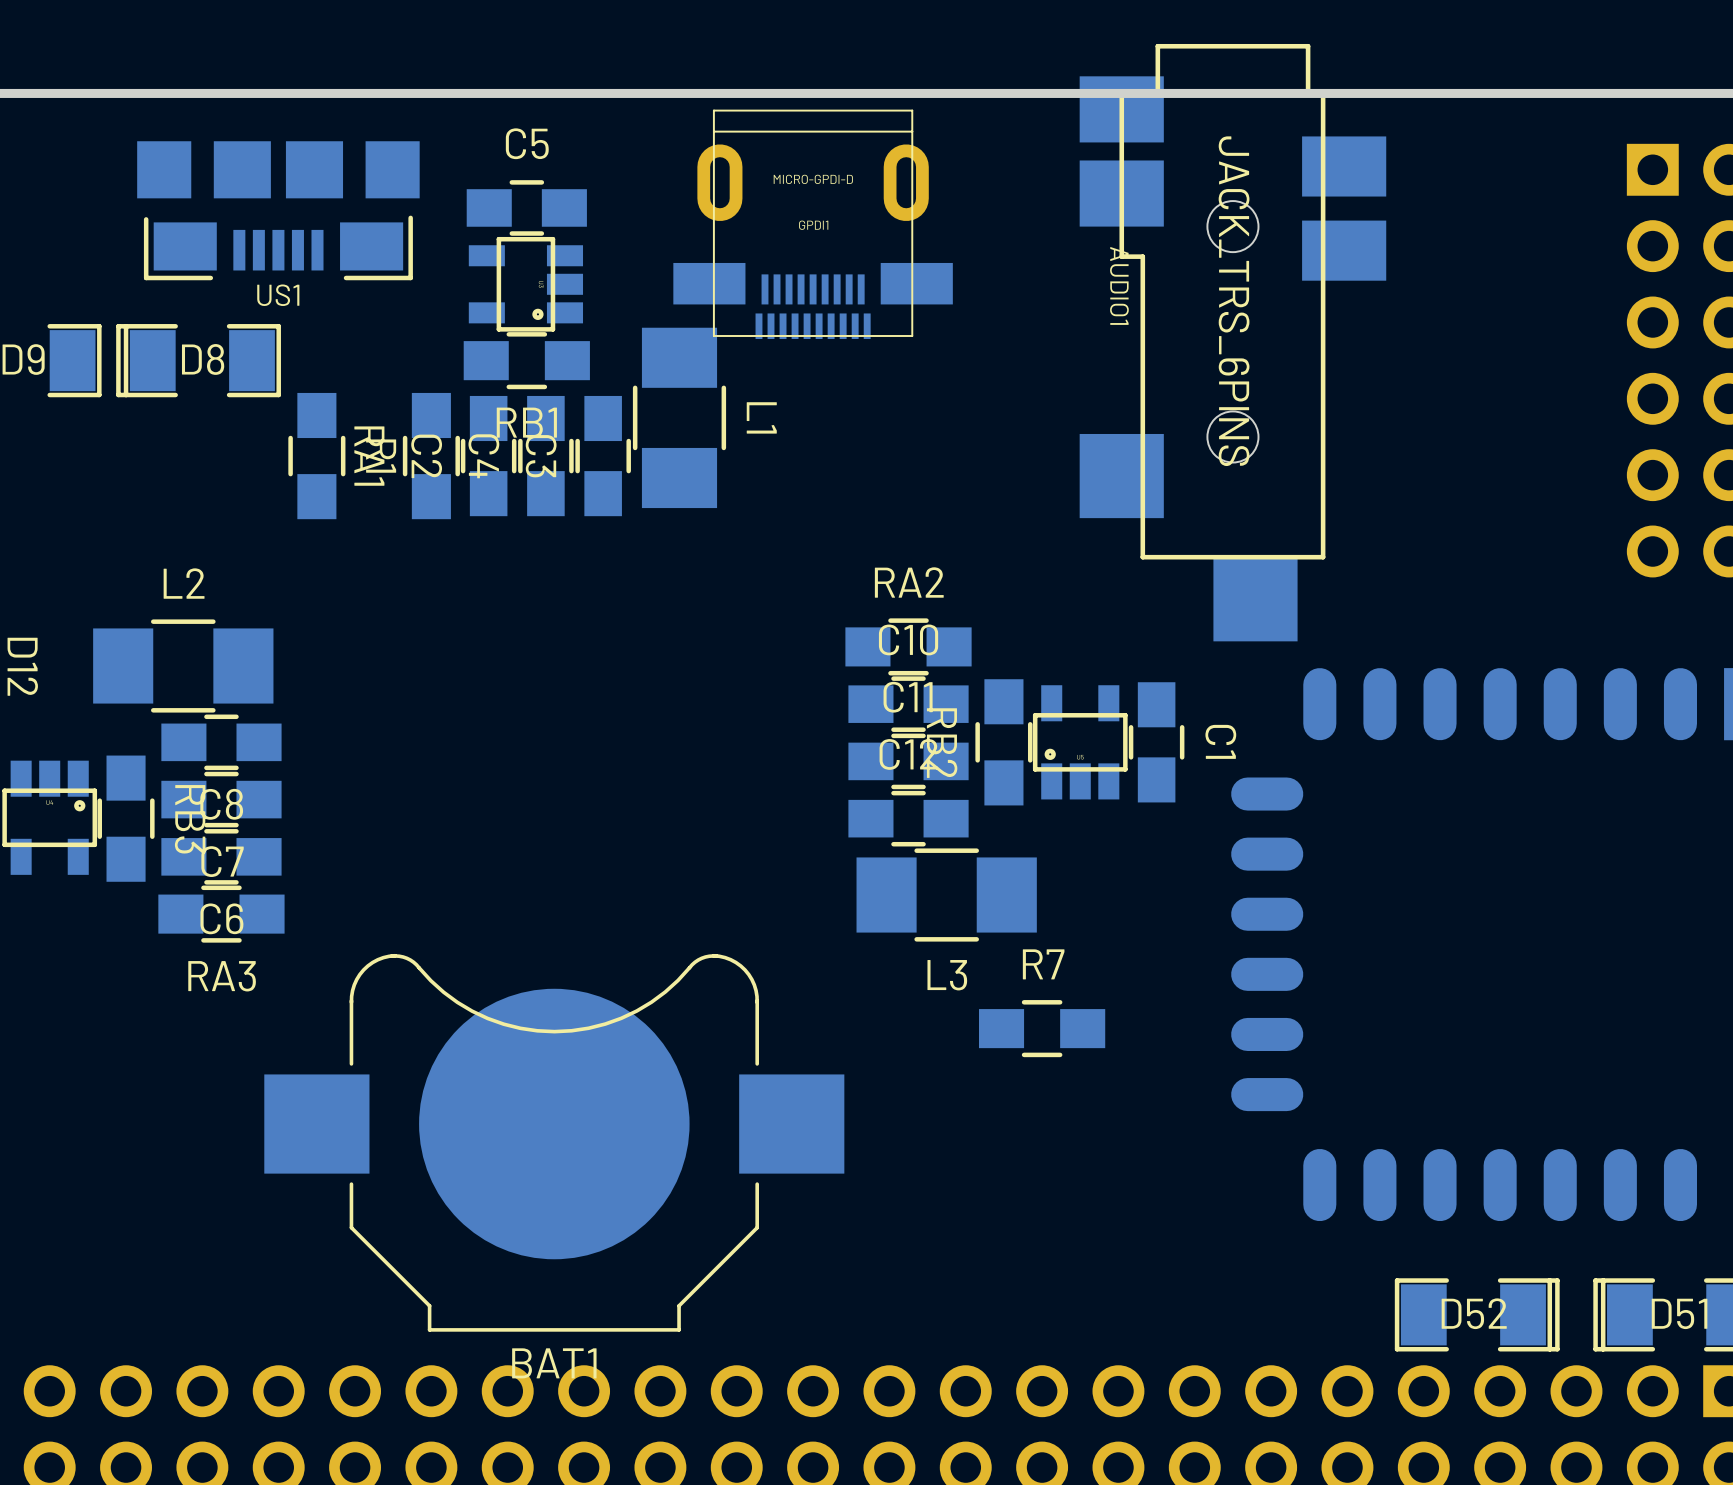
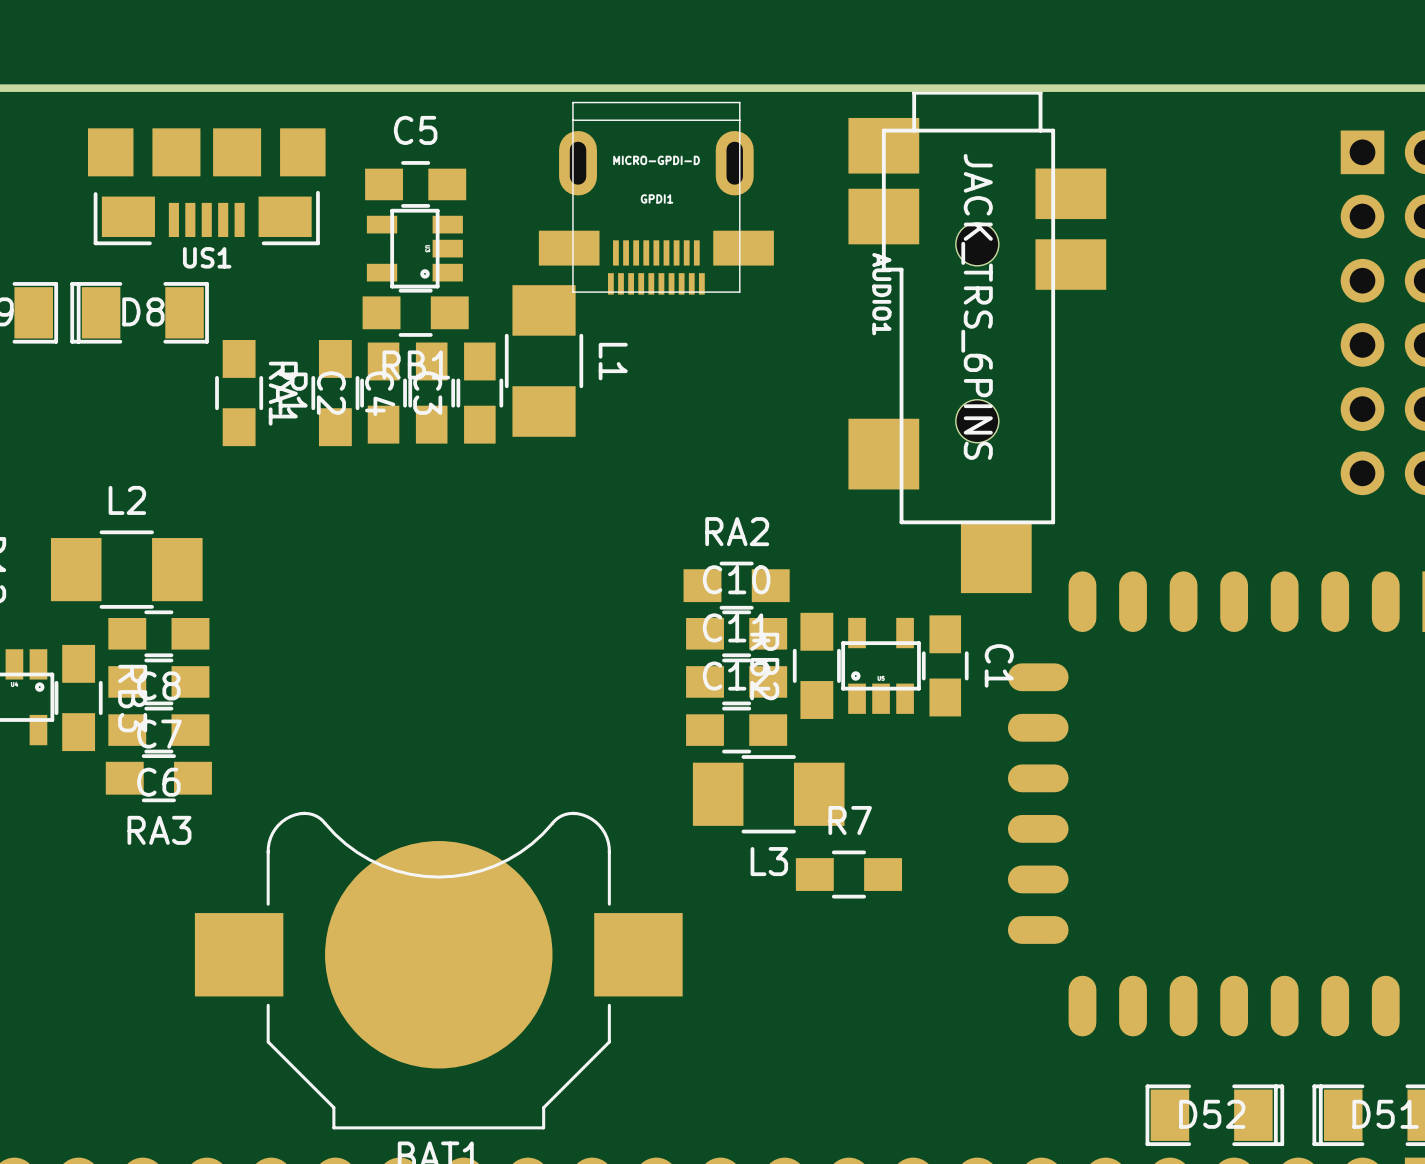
AUDIO1 position: (1232, 342) -> (977, 341)
RA2 position: (908, 646) -> (736, 585)
C10 position: (908, 704) -> (736, 633)
RB2 position: (1003, 742) -> (816, 665)
part position: (1080, 742) -> (881, 665)
C1 position: (1156, 742) -> (945, 665)
C11 position: (908, 761) -> (736, 681)
C12 position: (908, 818) -> (736, 730)
L3 position: (946, 895) -> (768, 794)

